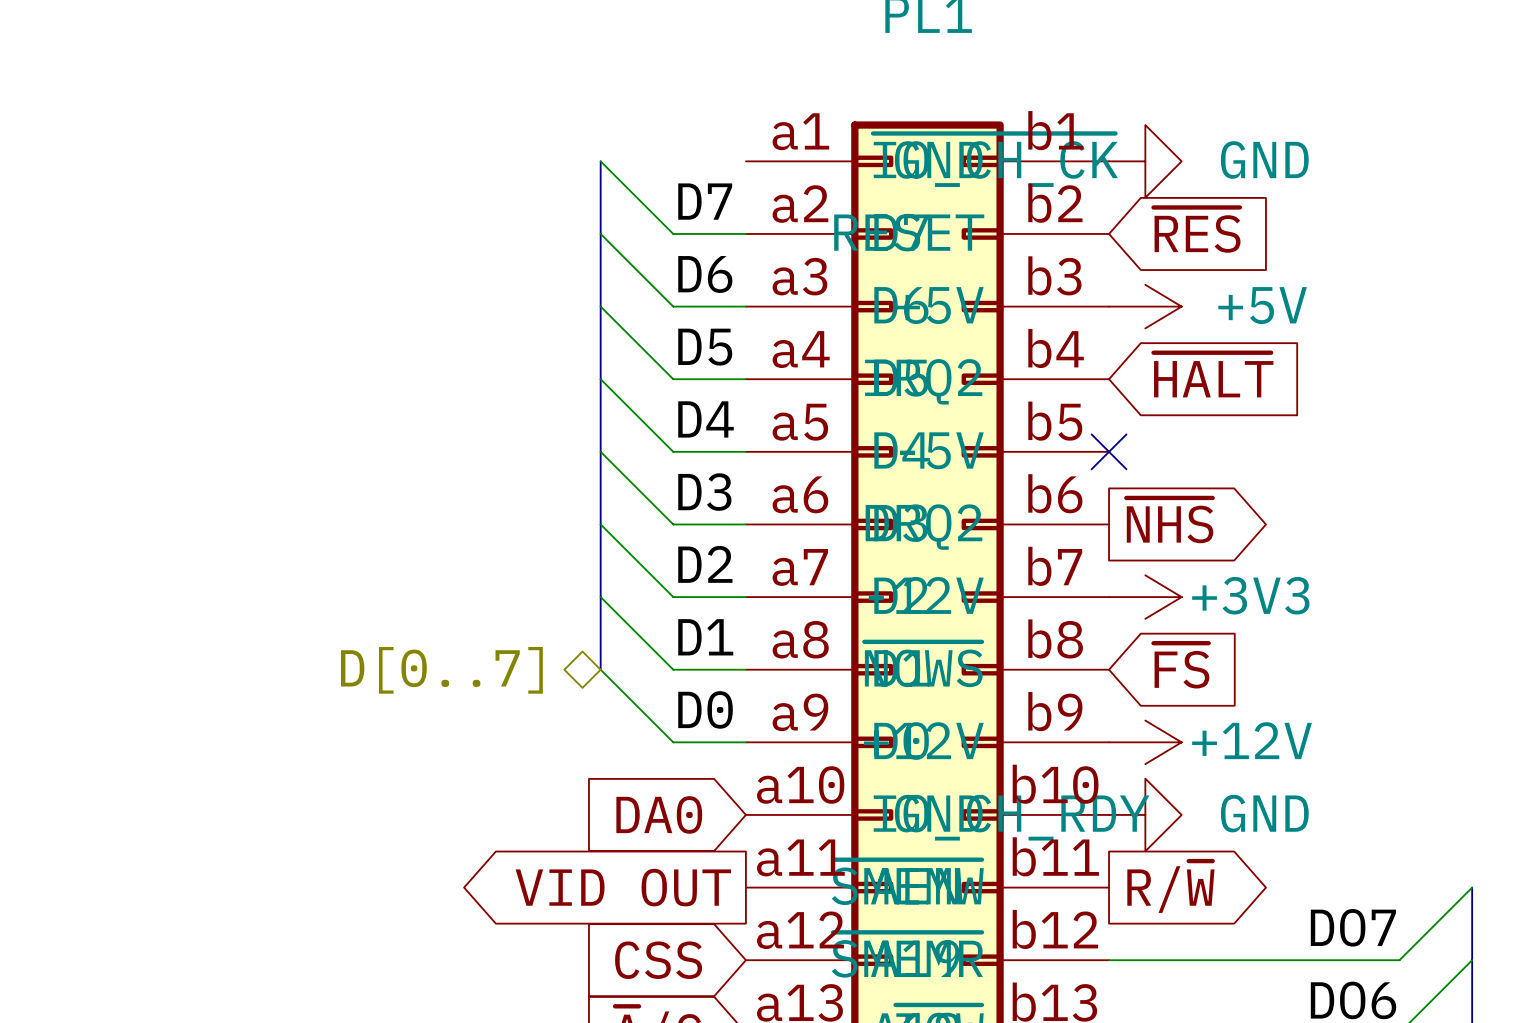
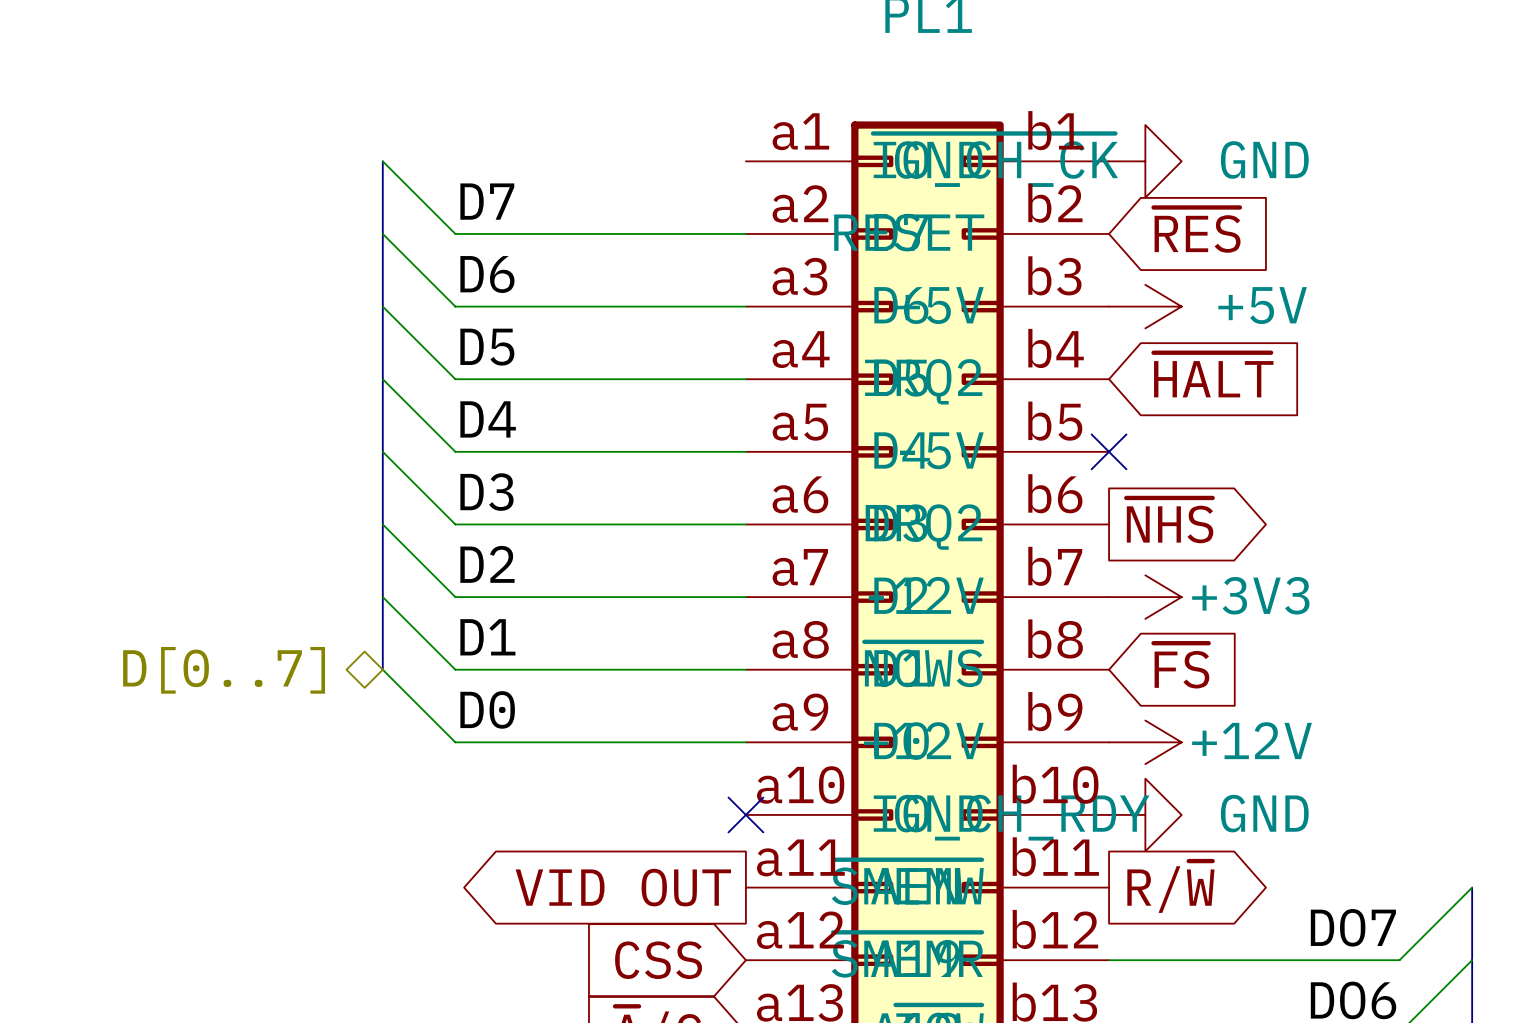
wire: (600, 161) (673, 233) -> (382, 161) (455, 233) (673, 233)
bus: (600, 161) (600, 669) -> (382, 161) (382, 669)
label position: D7 (705, 201) -> D7 (487, 201)
wire: (600, 233) (673, 306) -> (382, 233) (455, 306) (673, 306)
label position: D6 (705, 274) -> D6 (487, 274)
wire: (600, 306) (673, 379) -> (382, 306) (455, 379) (673, 379)
label position: D5 (705, 347) -> D5 (487, 347)
wire: (600, 379) (673, 451) -> (382, 379) (455, 451) (673, 451)
label position: D4 (706, 419) -> D4 (488, 419)
wire: (600, 451) (673, 524) -> (382, 451) (455, 524) (673, 524)
label position: D3 (704, 492) -> D3 (486, 492)
wire: (600, 524) (673, 597) -> (382, 524) (455, 597) (673, 597)
label position: D2 (705, 564) -> D2 (487, 564)
wire: (600, 597) (673, 669) -> (382, 597) (455, 669) (673, 669)
label position: D1 (705, 637) -> D1 (487, 637)
wire: (600, 669) (673, 742) -> (382, 669) (455, 742) (673, 742)
hierarchical label position: D[0..7] (441, 670) -> D[0..7] (224, 670)
label position: D0 (705, 709) -> D0 (487, 709)
global label: DA0 (659, 814) -> none
no-connect mark: none -> (745, 814)

